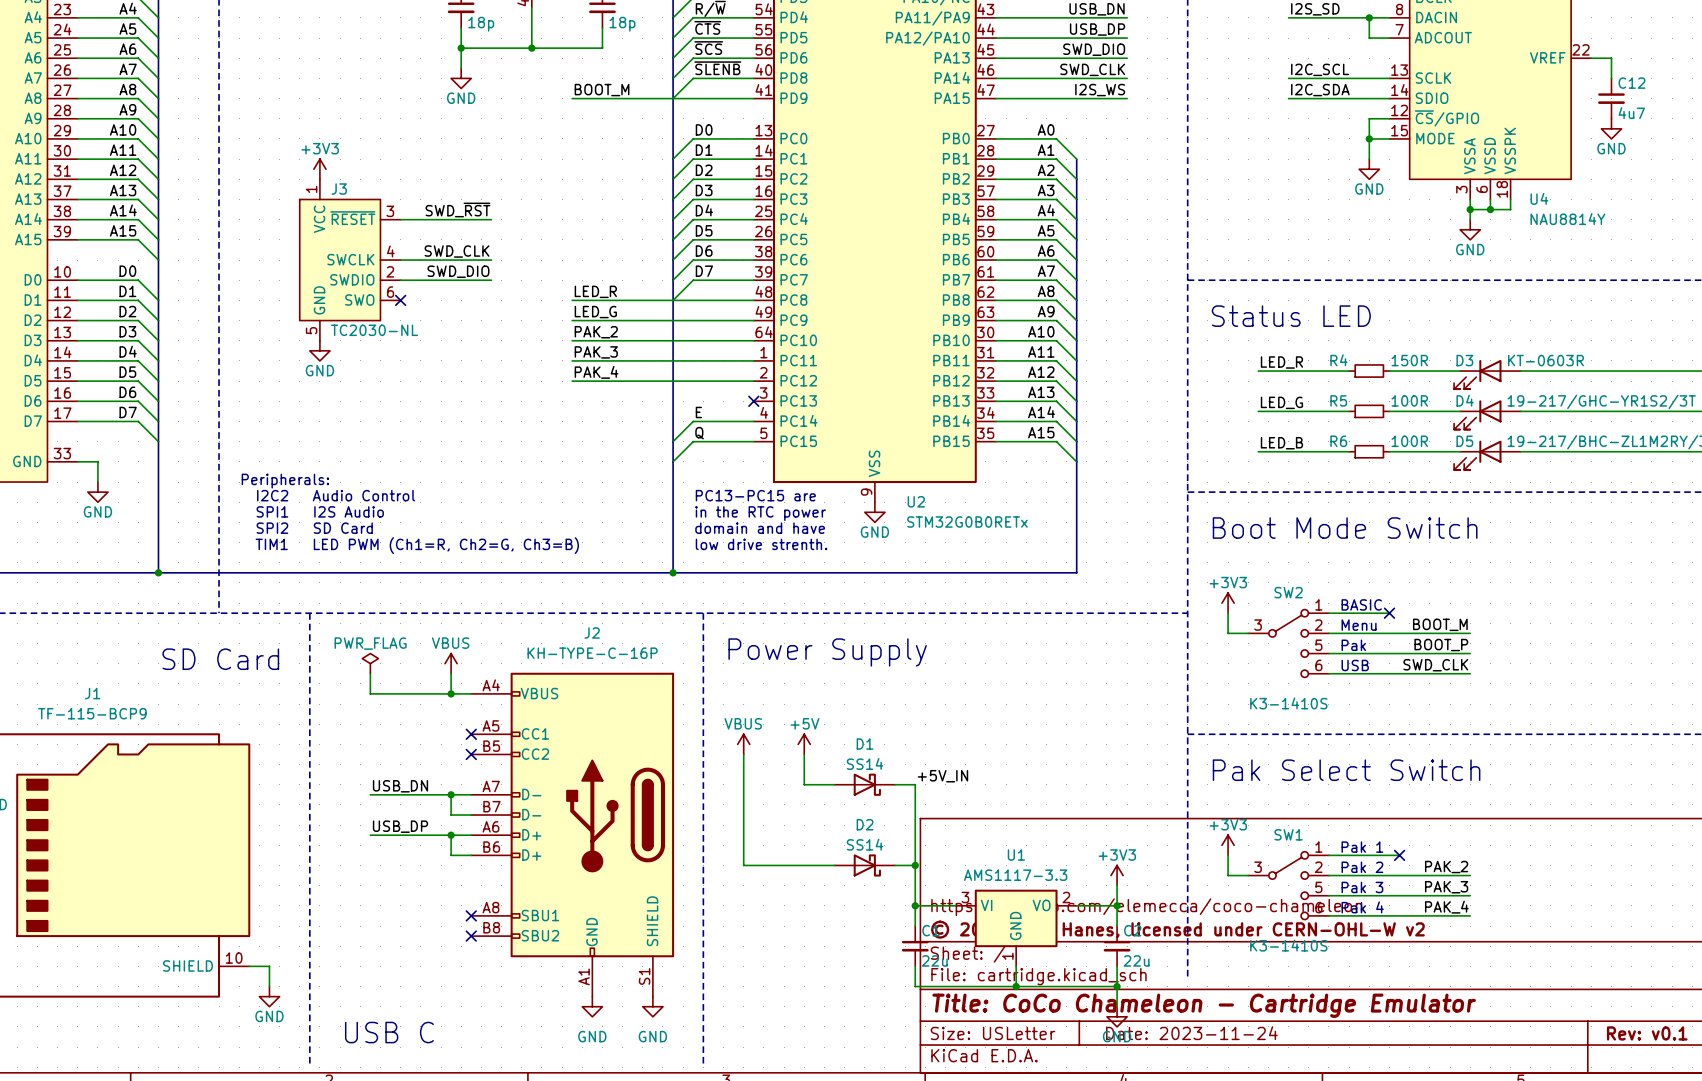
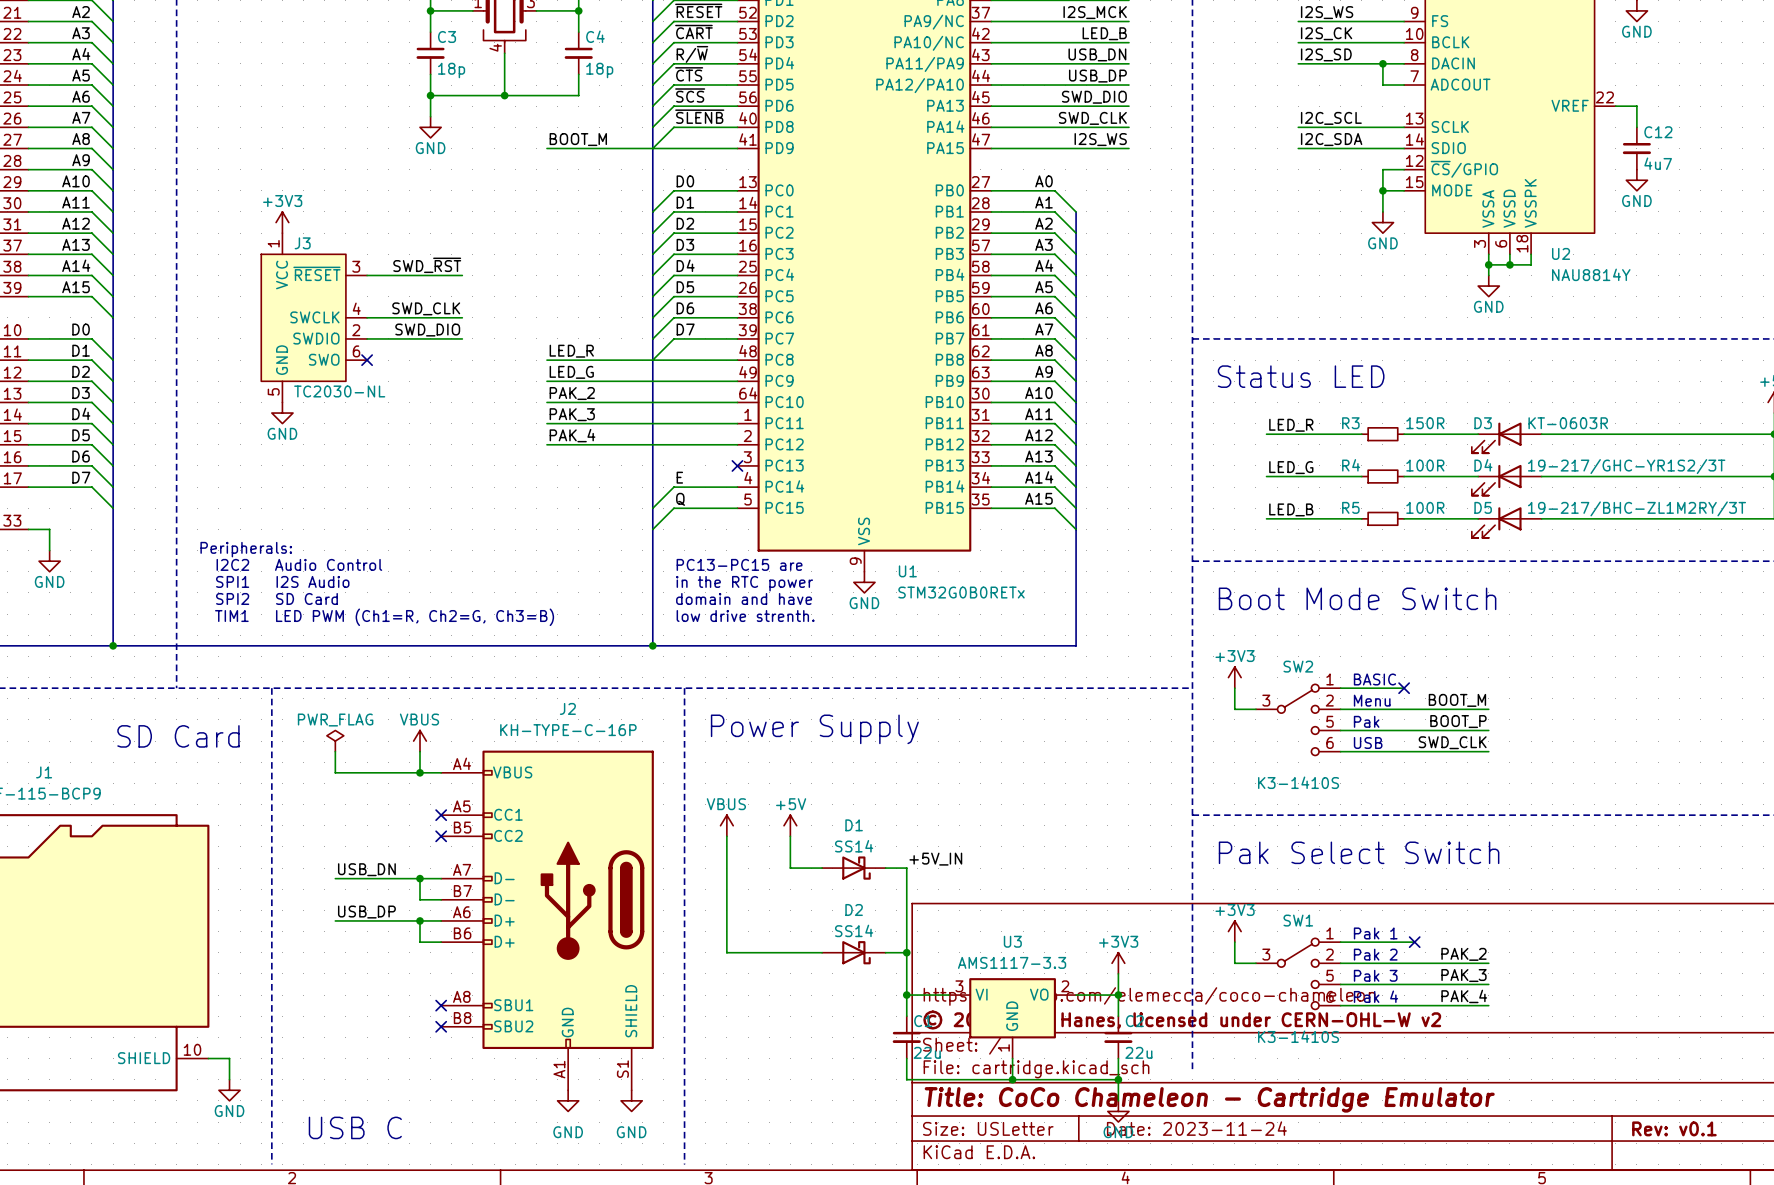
U4 name: U4 (1539, 198) -> U2 (1561, 253)
R4 name: R4 (1338, 360) -> R3 (1350, 423)
R5 name: R5 (1338, 400) -> R4 (1351, 465)
R6 name: R6 (1338, 441) -> R5 (1350, 507)
U2 name: U2 (916, 501) -> U1 (907, 571)
U1 name: U1 (1016, 854) -> U3 (1012, 941)

